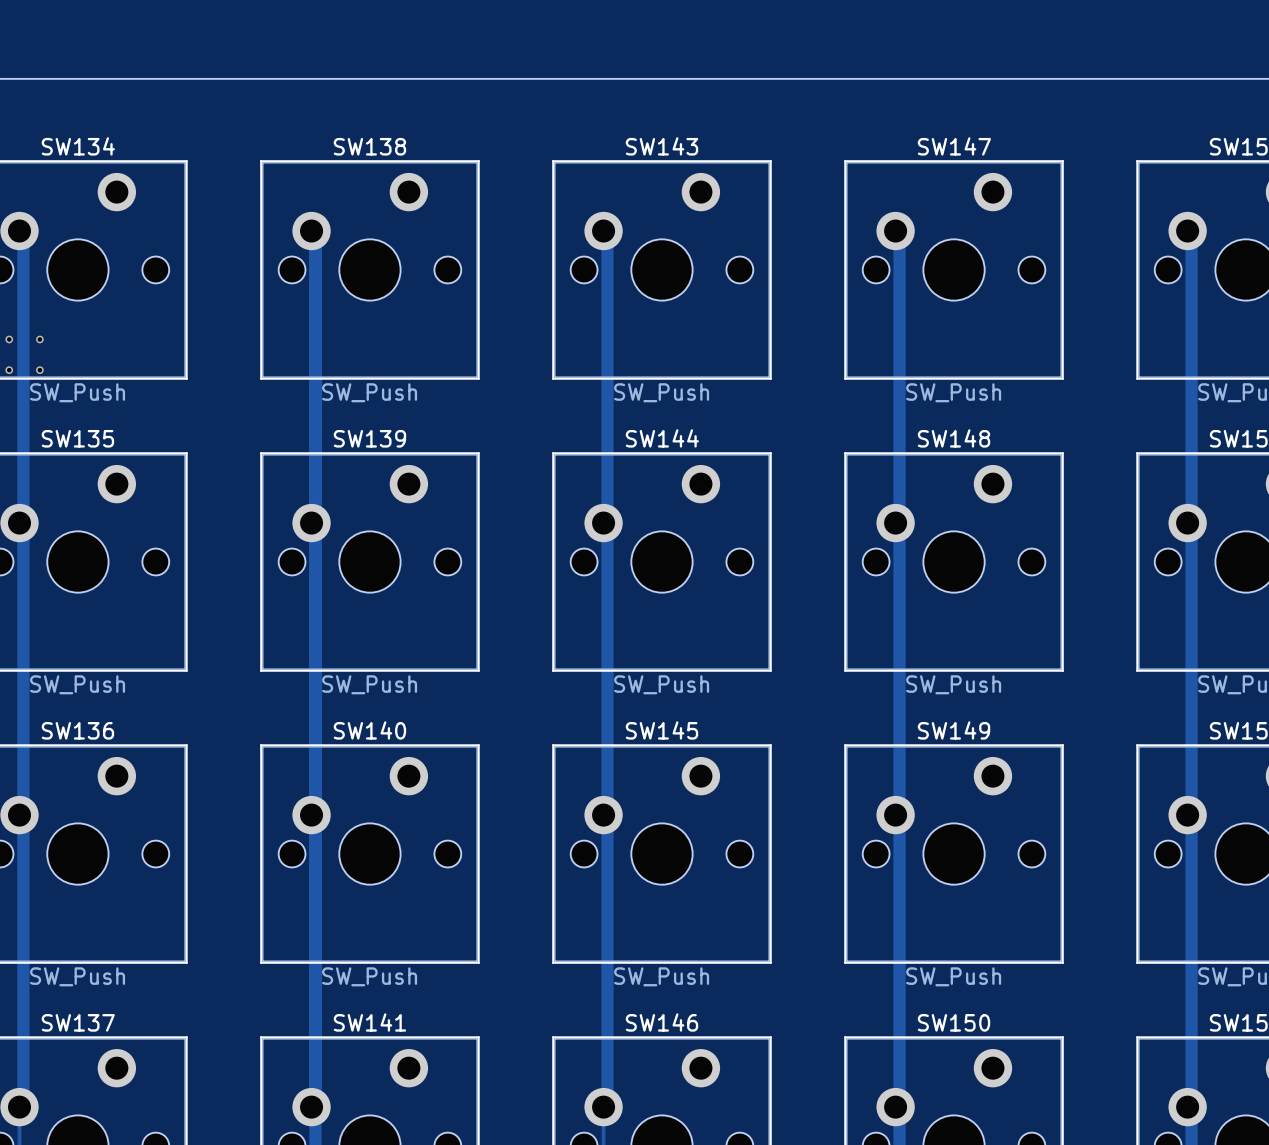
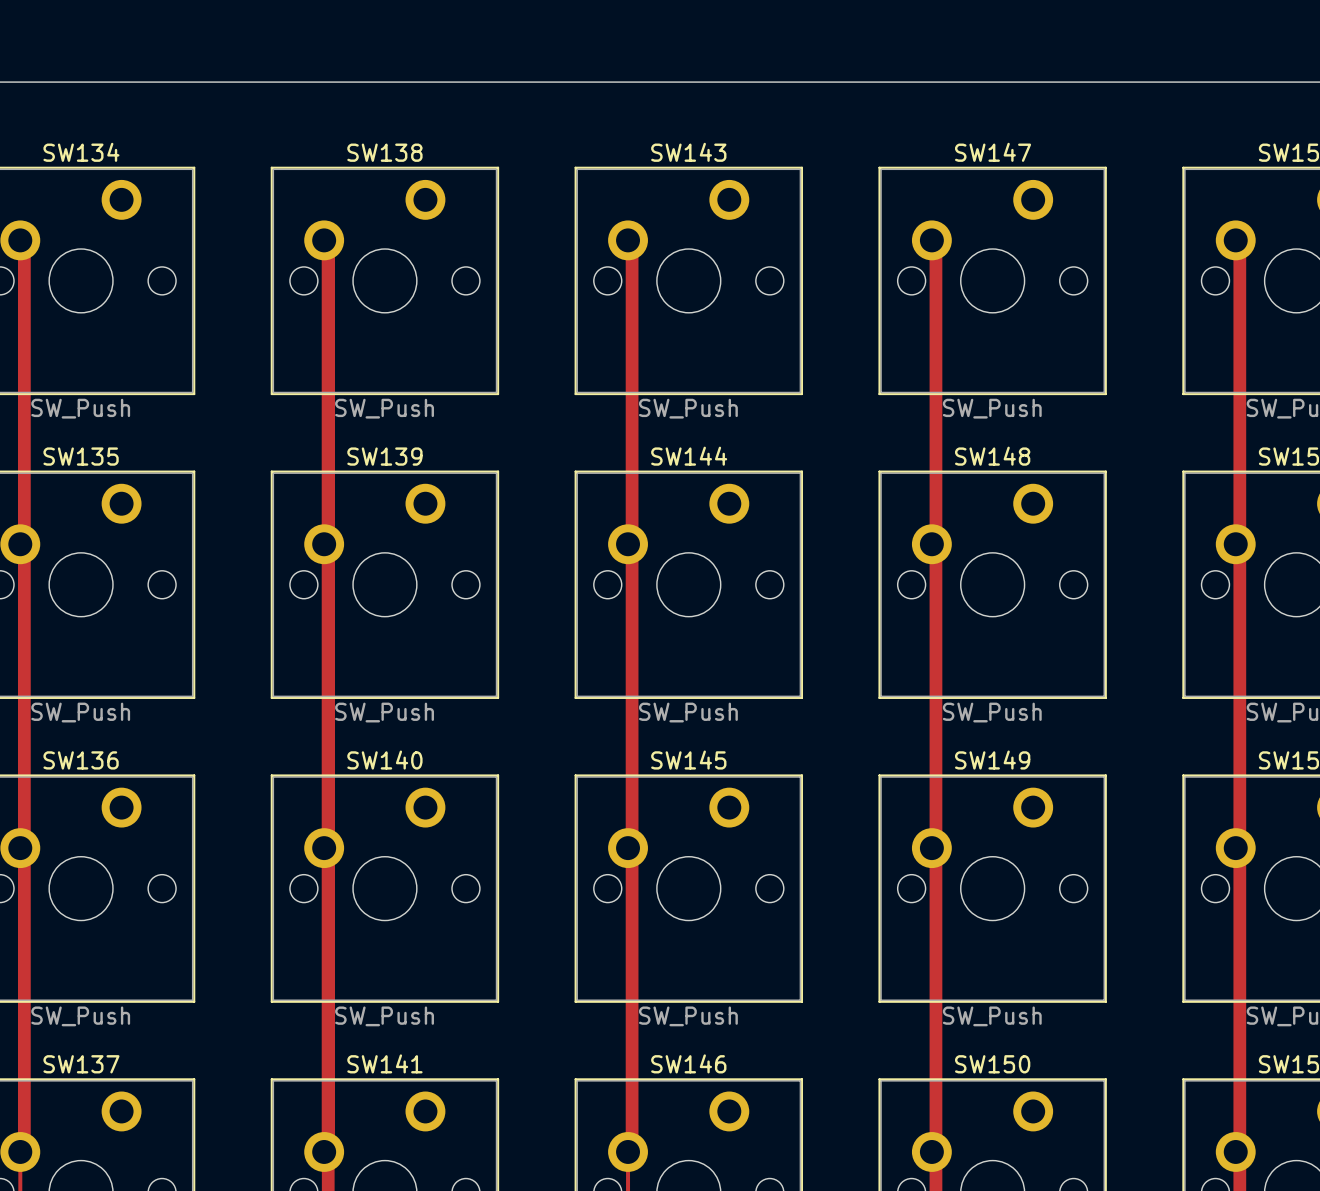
via: (9, 339) -> none
via: (39, 339) -> none
via: (9, 370) -> none
via: (39, 370) -> none

